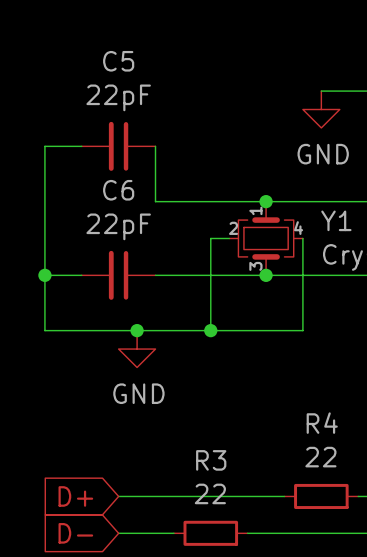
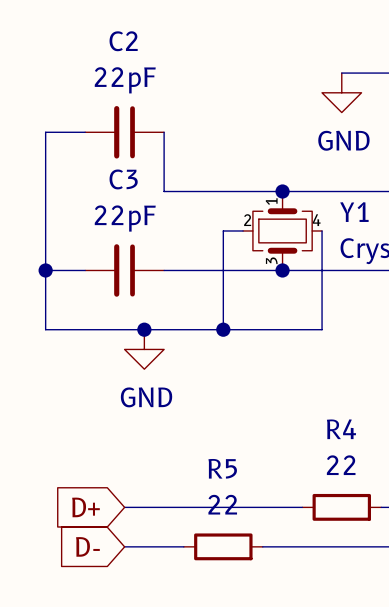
C5 name: C5 (118, 61) -> C2 (123, 41)
C6 name: C6 (118, 190) -> C3 (123, 179)
R3 name: R3 (211, 460) -> R5 (222, 468)

